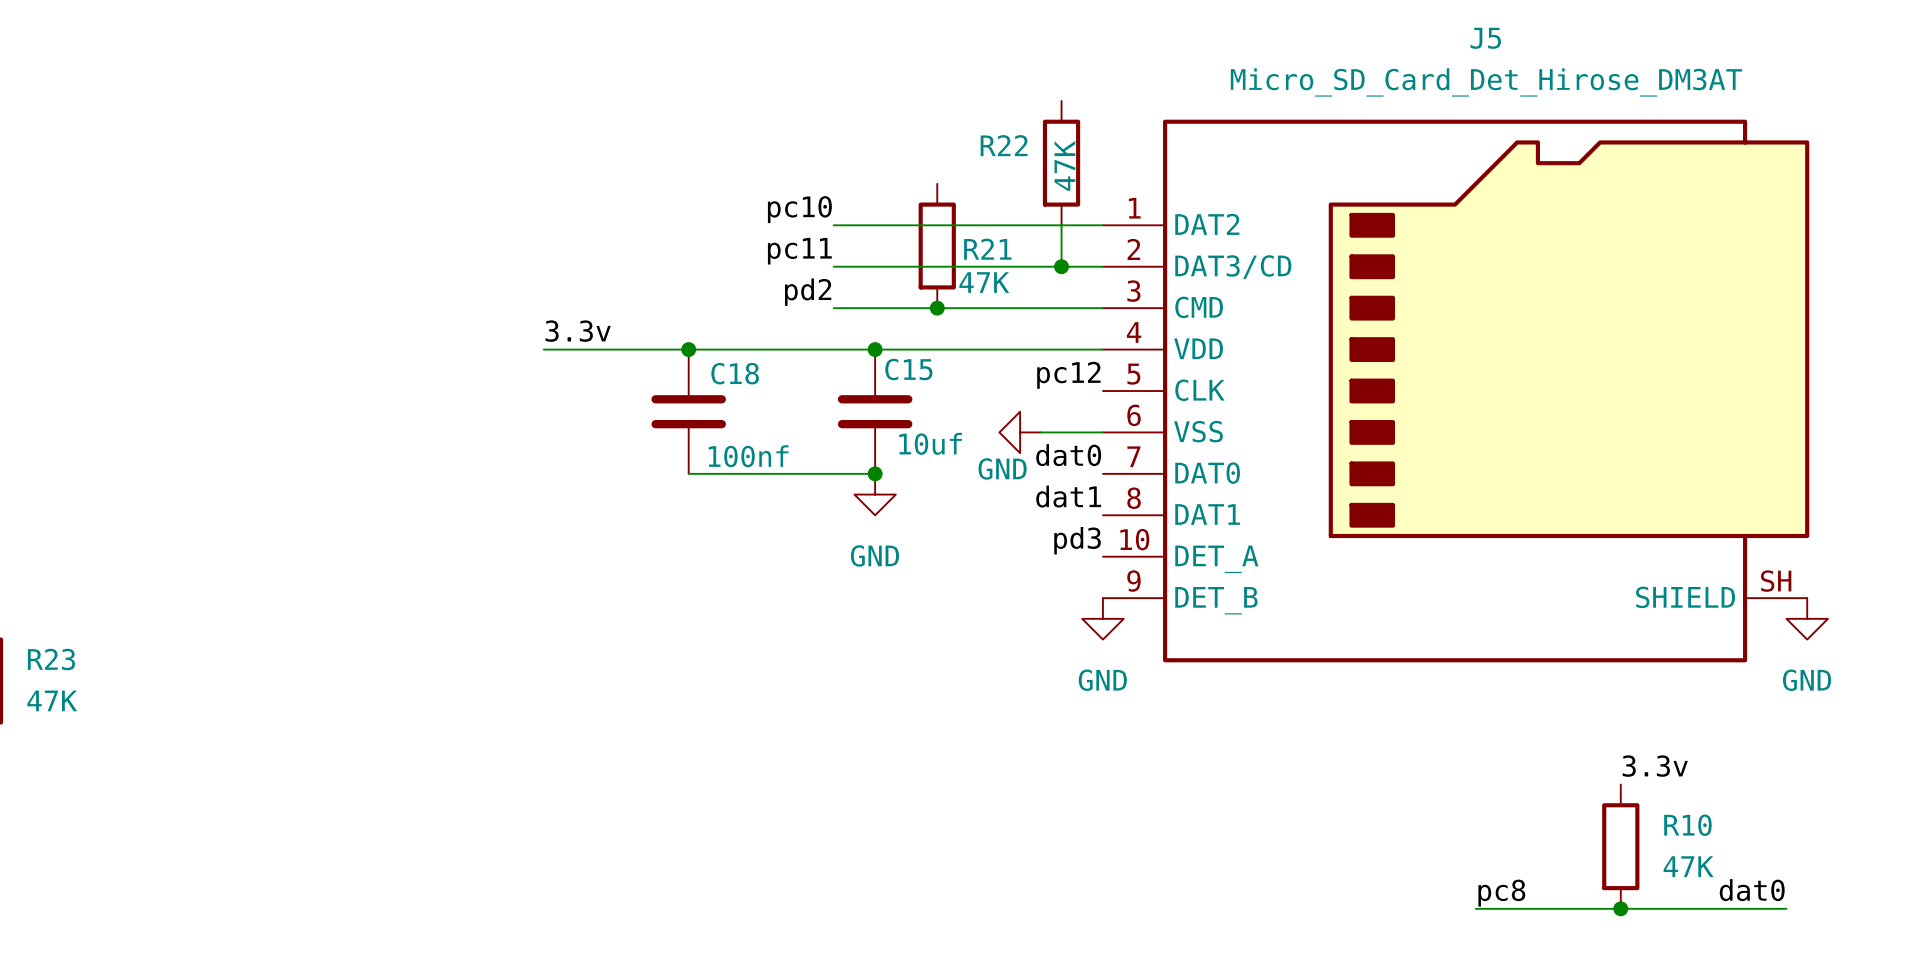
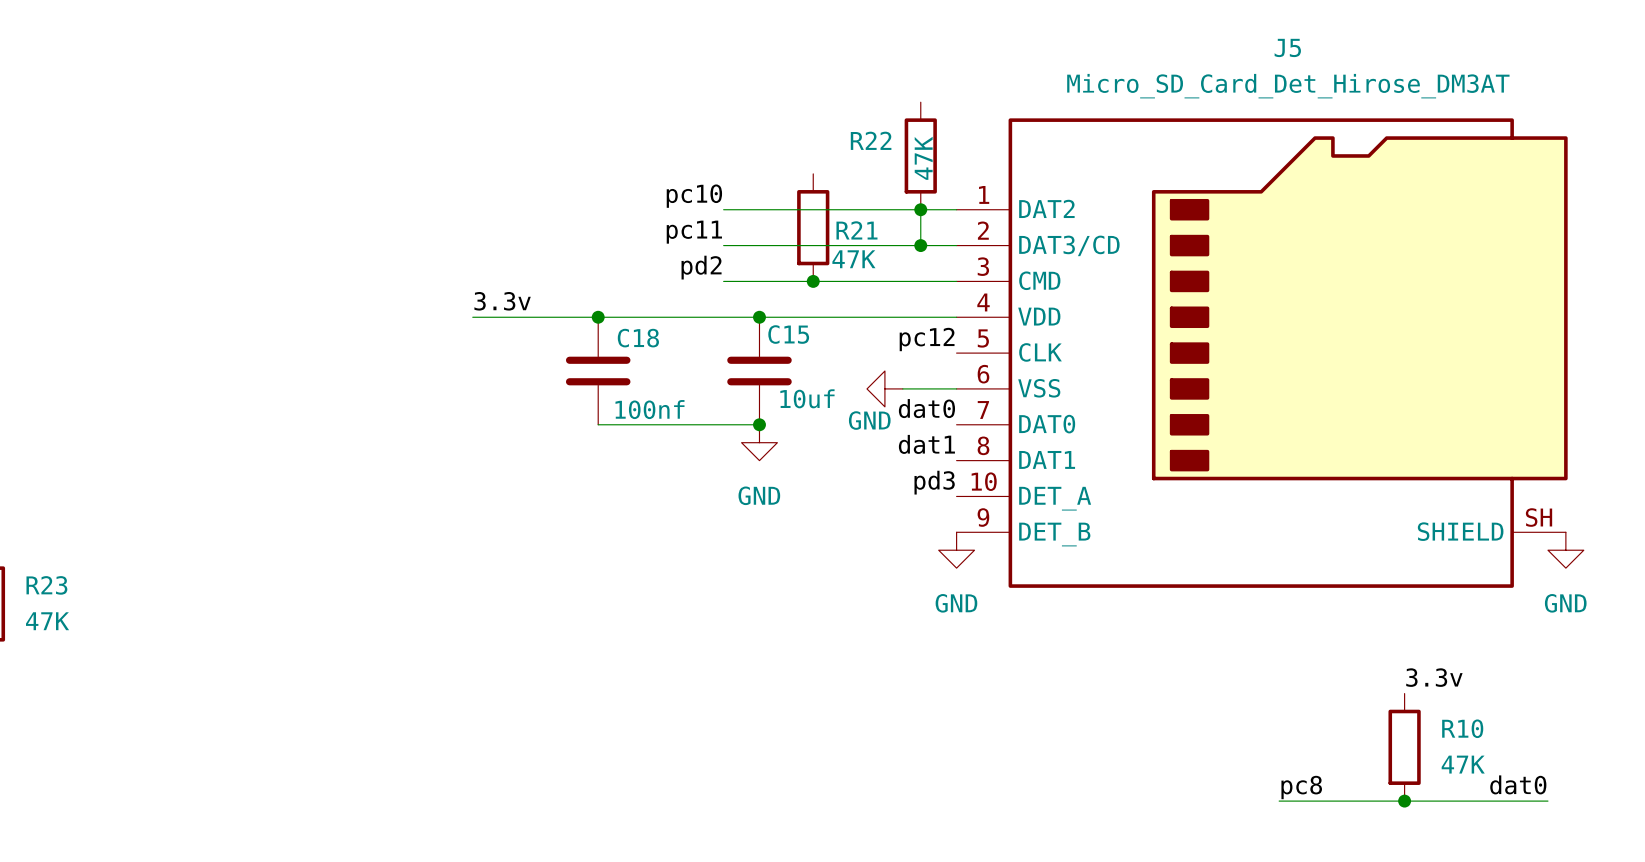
junction: none -> (920, 209)

